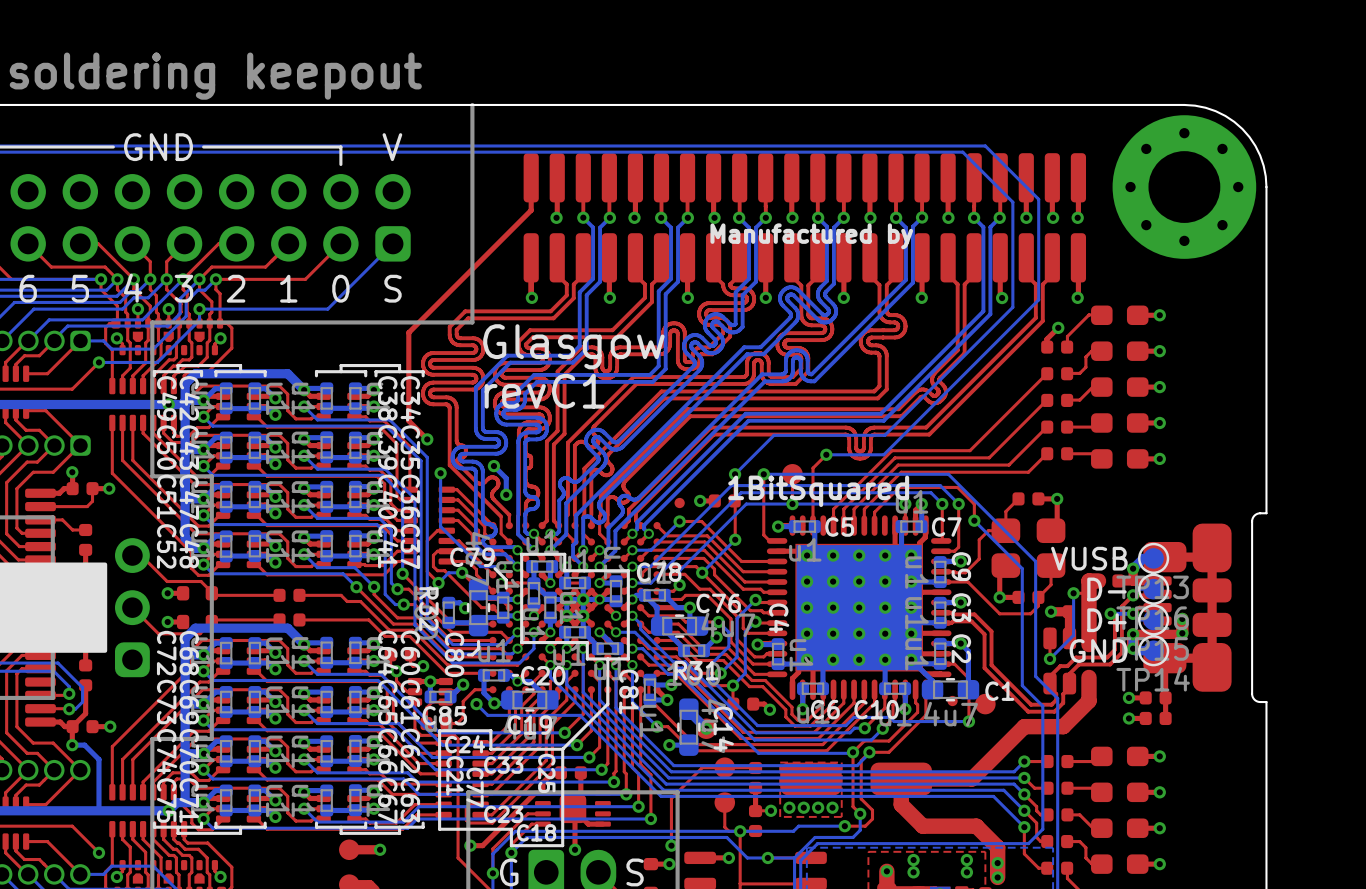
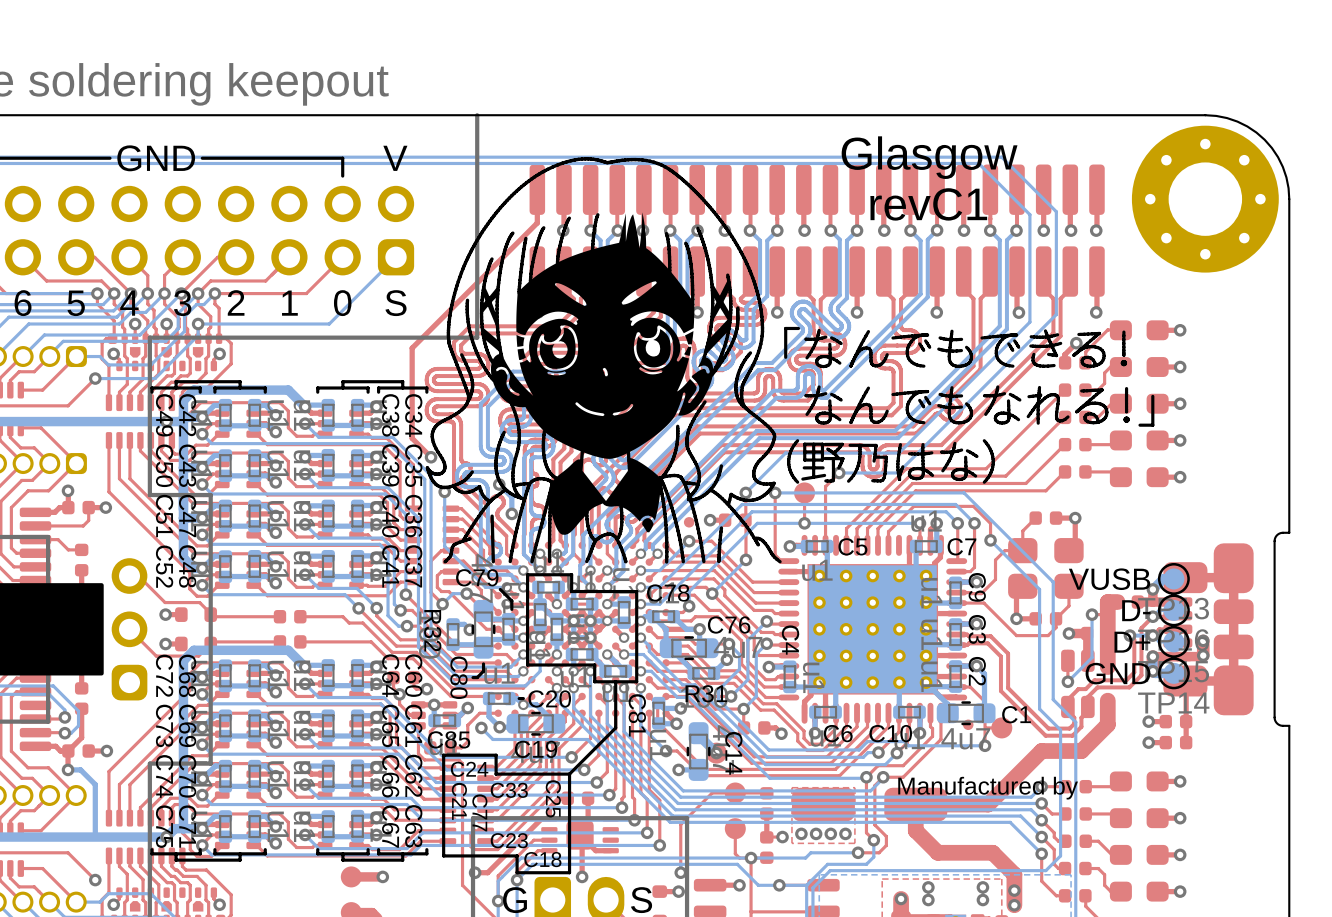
drawing: none -> [425, 157, 1155, 564]
text: Manufactured by (811, 236) -> none
text position: Glasgow (573, 346) -> Glasgow (929, 157)
text position: revC1 (544, 391) -> revC1 (928, 204)
text: 1BitSquared (818, 491) -> none
text: none -> Manufactured by (988, 788)

